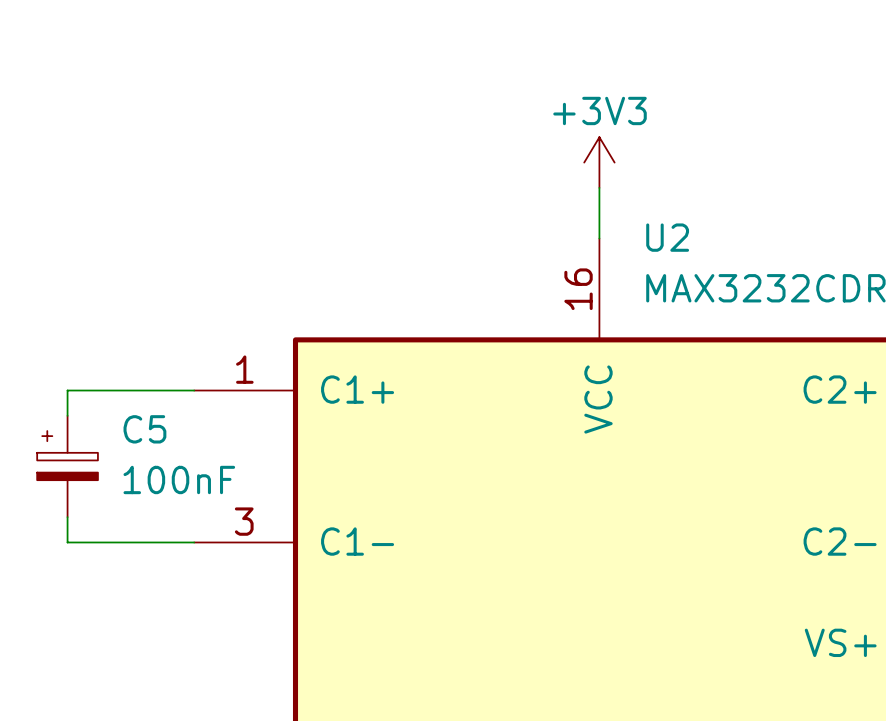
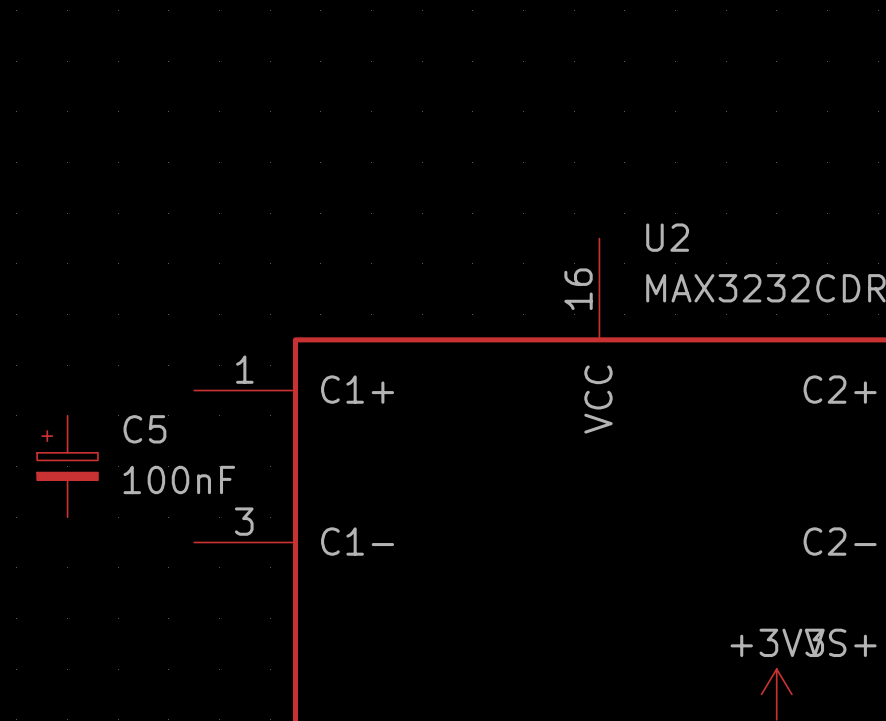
power symbol: +3V3 (599, 162) -> none
wire: (599, 187) (599, 238) -> none
wire: (194, 390) (67, 390) (67, 415) -> none
wire: (67, 517) (67, 542) (194, 542) -> none
power symbol: none -> +3V3 (776, 694)

